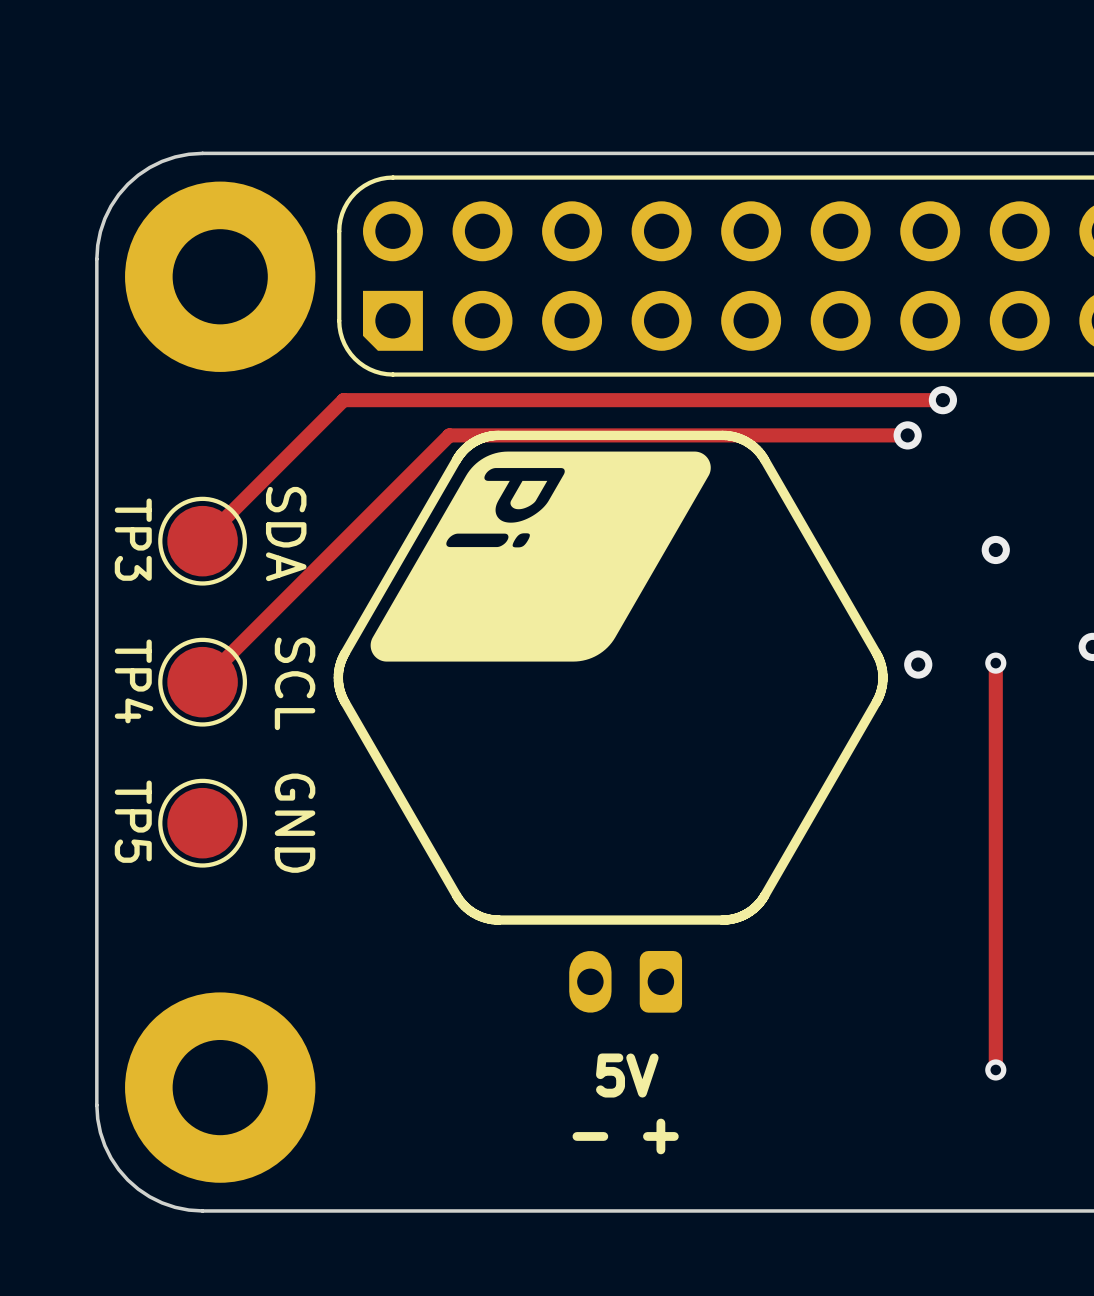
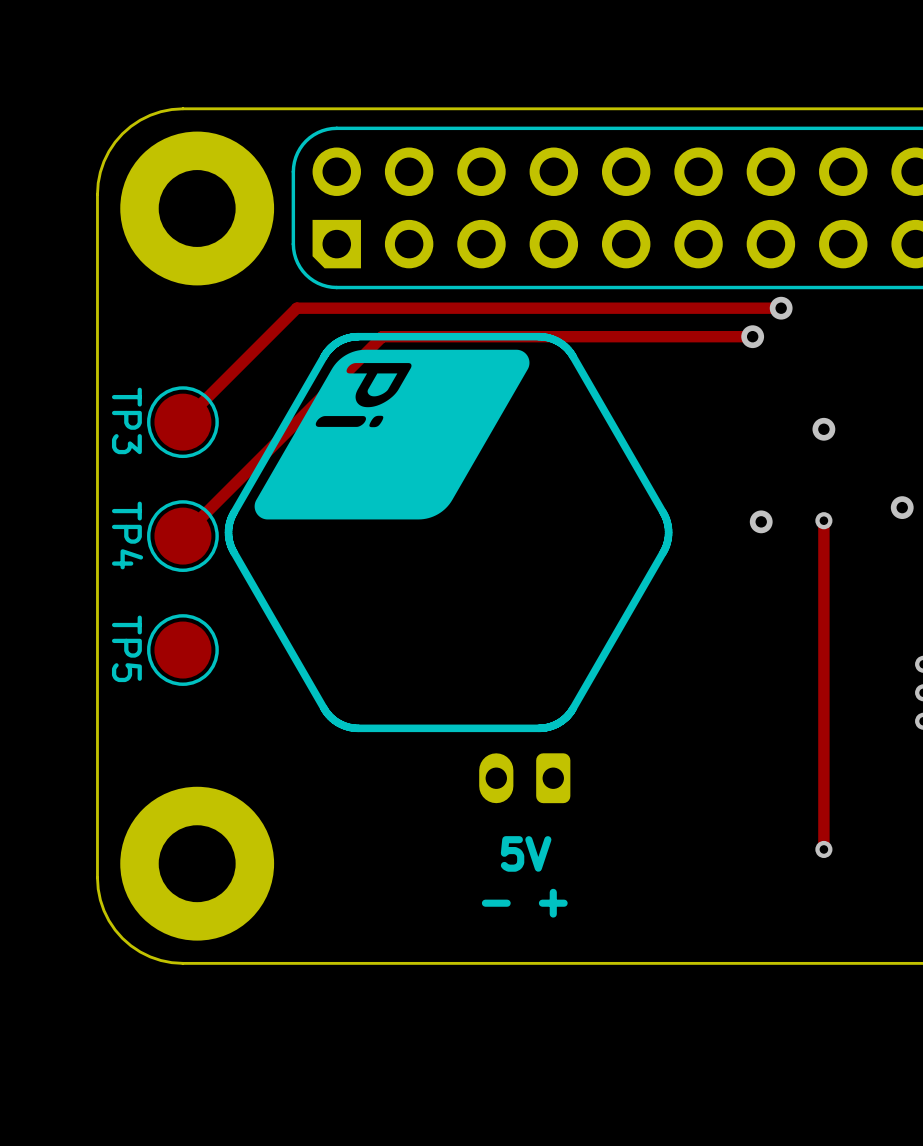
text: SDA (286, 534) -> none
drawing position: (610, 677) -> (448, 532)
text: SCL (295, 683) -> none
text: GND (295, 823) -> none

